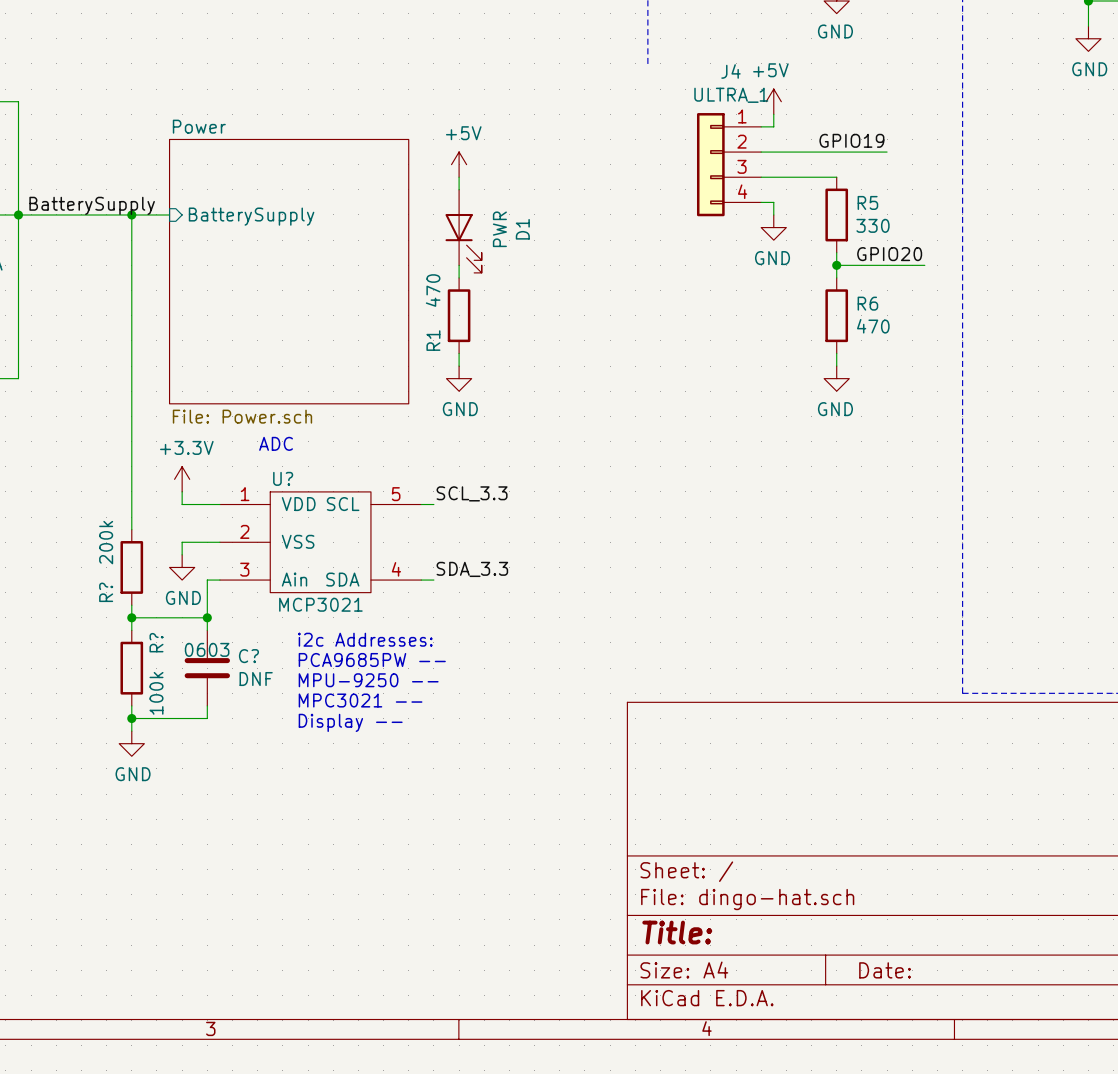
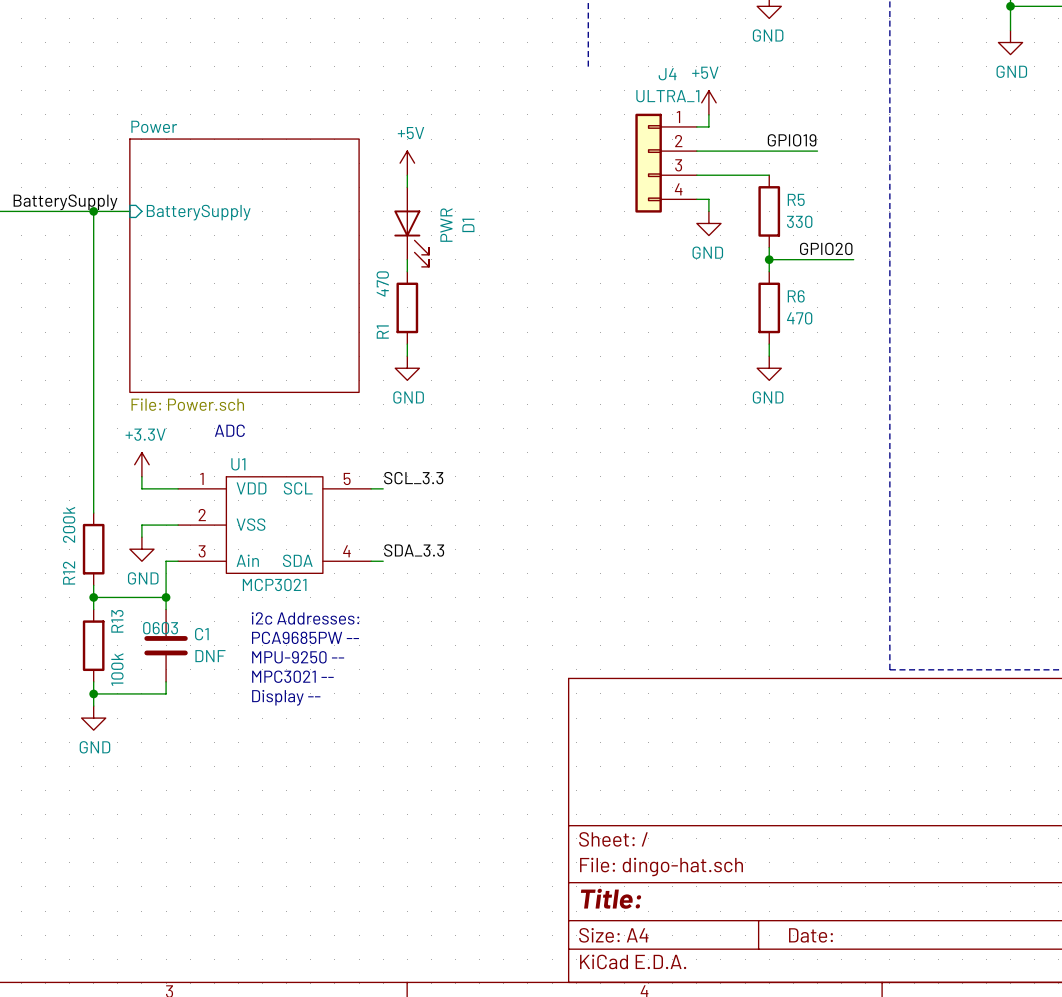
U? name: U? (283, 478) -> U1 (238, 464)
R? name: R? (106, 592) -> R12 (69, 573)
R? name: R? (156, 642) -> R13 (117, 621)
C? name: C? (248, 656) -> C1 (201, 634)

